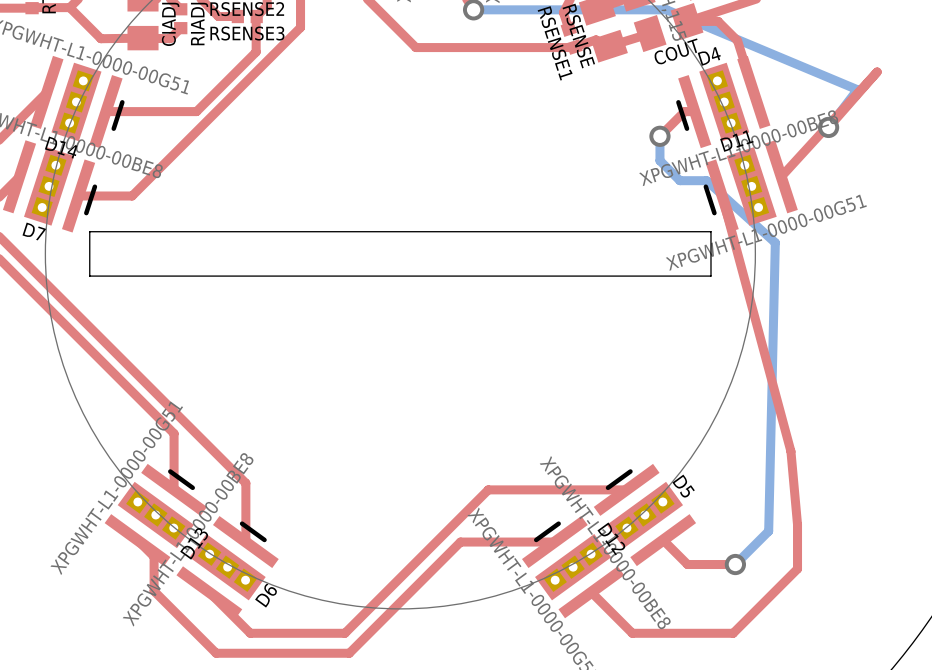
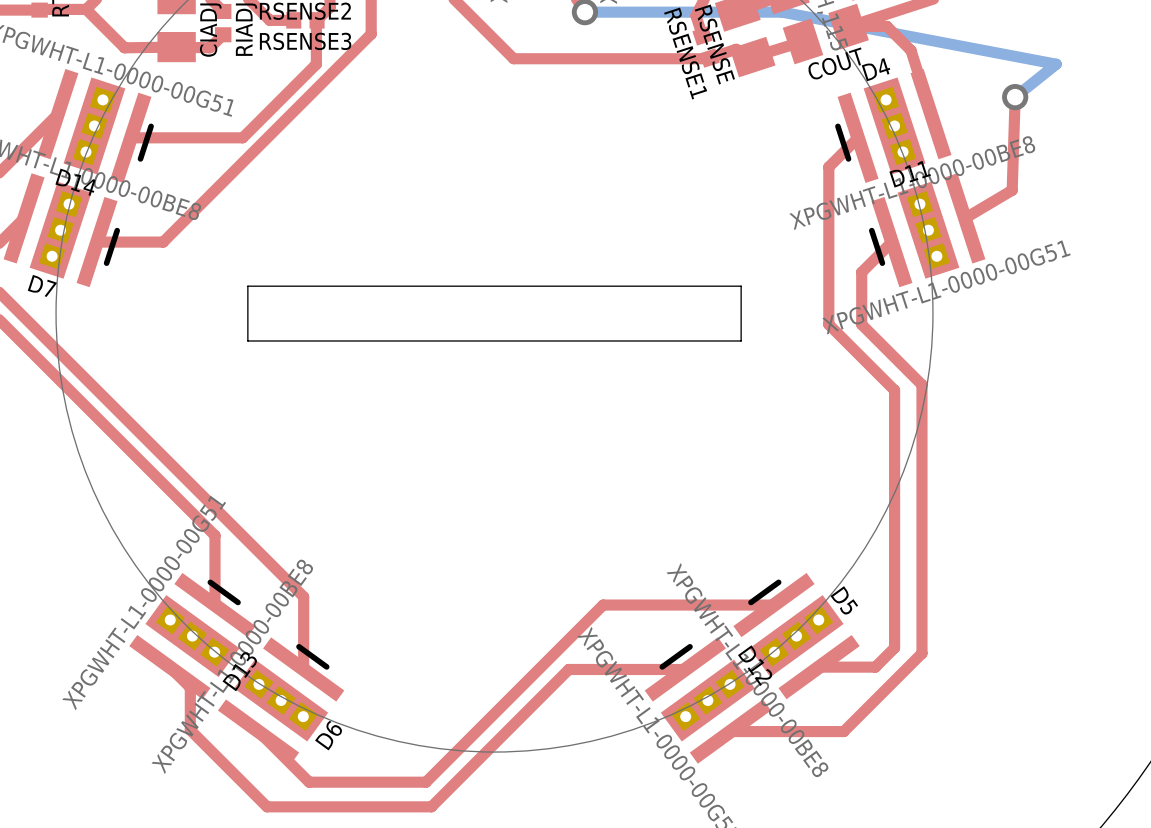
bottom track: (633, 9) (666, 9) (857, 89) (828, 127) -> (782, 12) (1056, 64) (1015, 97)
top track: (694, 111) (684, 111) (659, 136) -> (858, 137) (828, 167) (828, 324) (894, 390) (894, 647) (875, 667) (819, 667)
top track: (828, 127) (877, 71) (781, 176) -> (1015, 97) (1012, 190) (964, 218)
via position: (828, 127) -> (1015, 97)
bottom track: (659, 136) (659, 160) (679, 180) (706, 180) (775, 242) (768, 531) (735, 564) -> none
via: (659, 136) -> none
top track: (722, 196) (790, 451) (797, 524) (797, 568) (733, 633) (632, 633) (591, 592) -> (891, 242) (861, 272) (861, 324) (921, 384) (921, 653) (843, 731) (730, 731)
board edge: (200, 231) (89, 231) (89, 276) (200, 276) -> (247, 286) (247, 340)
board edge: (600, 231) (710, 231) (710, 276) (600, 276) -> (741, 286) (741, 340)
top track: (663, 540) (687, 564) (735, 564) -> none
via: (735, 564) -> none

